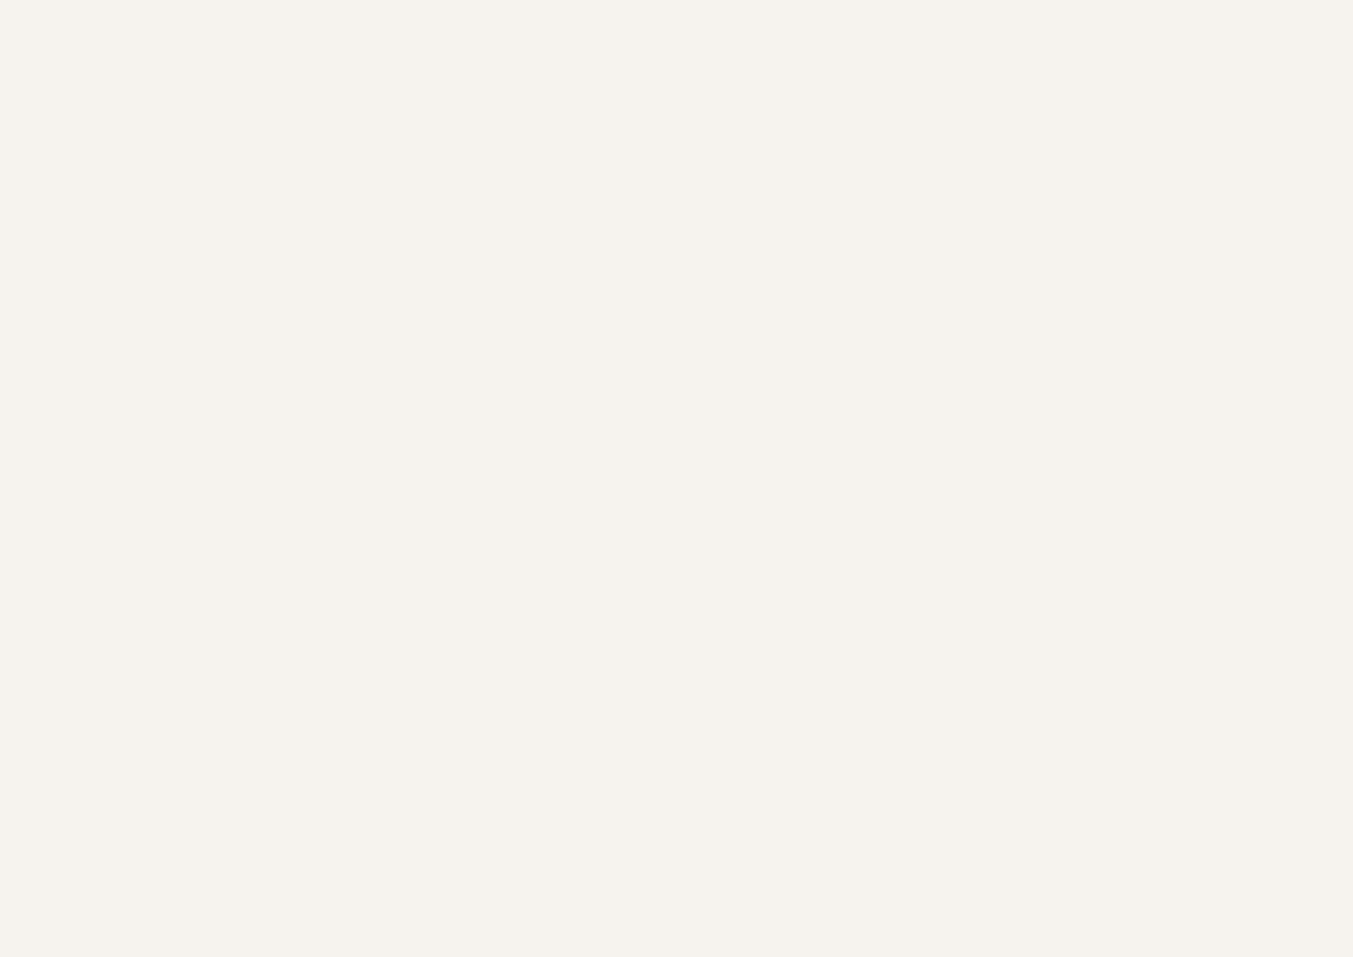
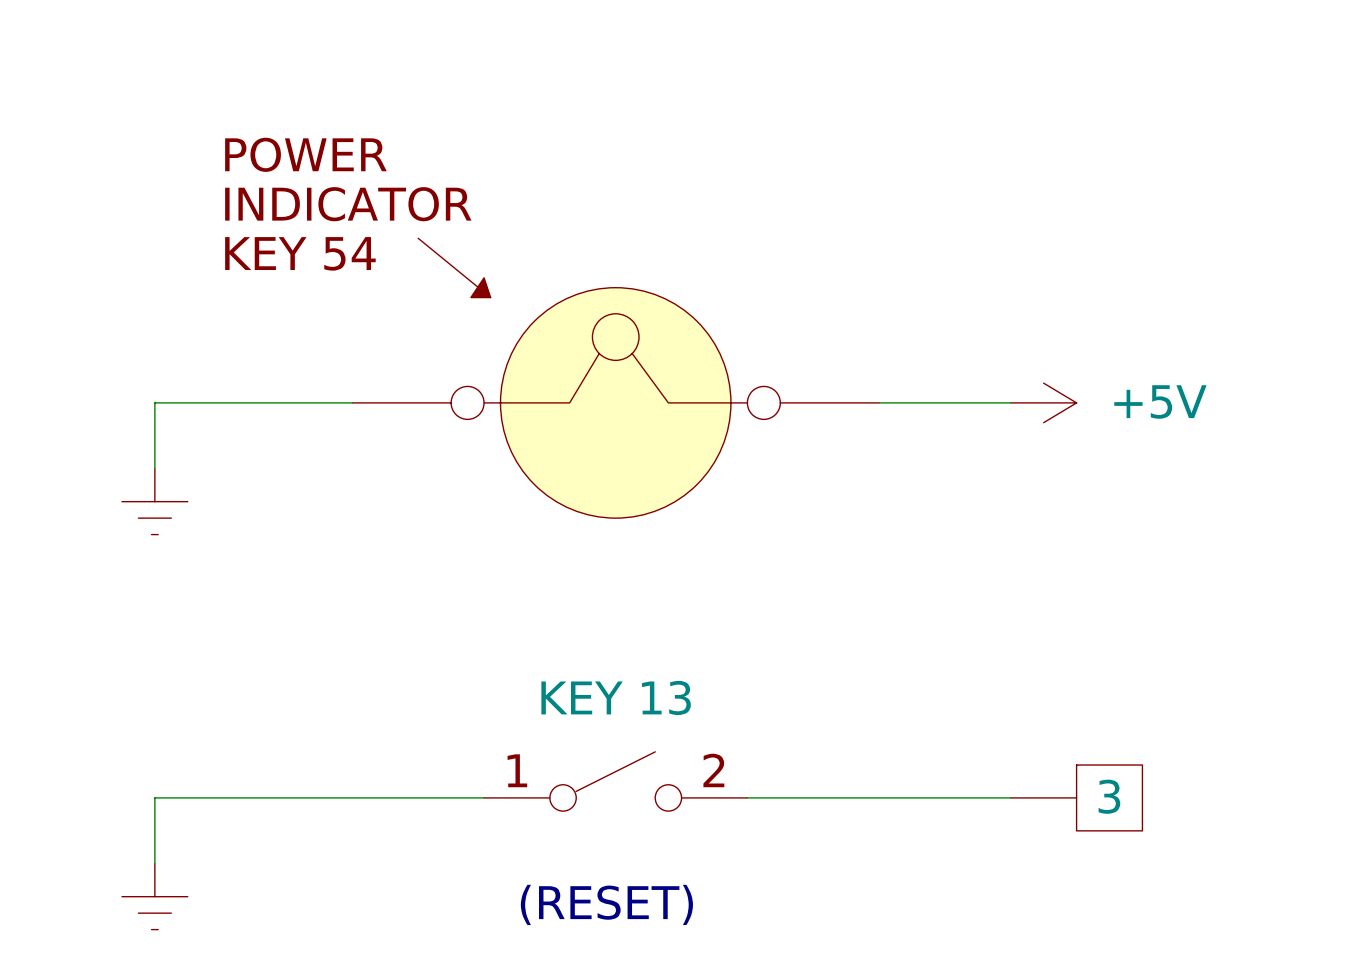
part: none -> (615, 378)
wire: none -> (352, 402) (154, 402) (154, 468)
wire: none -> (879, 402) (1010, 402)
power symbol: none -> +5V (1043, 402)
power symbol: none -> (154, 501)
part: none -> KEY 13 (615, 781)
wire: none -> (484, 797) (154, 797) (154, 863)
wire: none -> (747, 797) (1010, 797)
part: none -> 3 (1076, 797)
power symbol: none -> (154, 896)
text: none -> (RESET) (606, 904)

